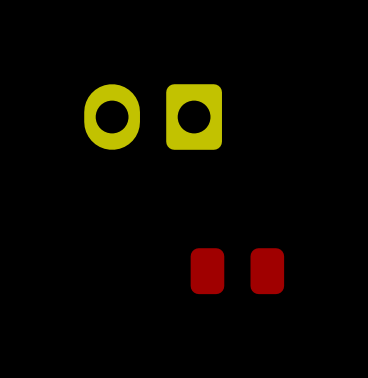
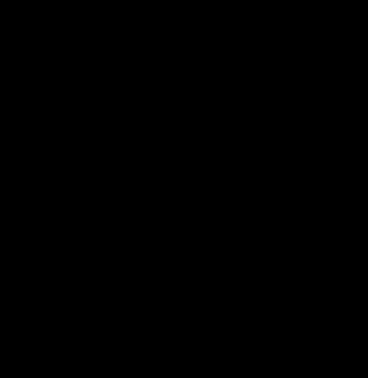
part: (153, 117) -> none
part: (237, 271) -> none

